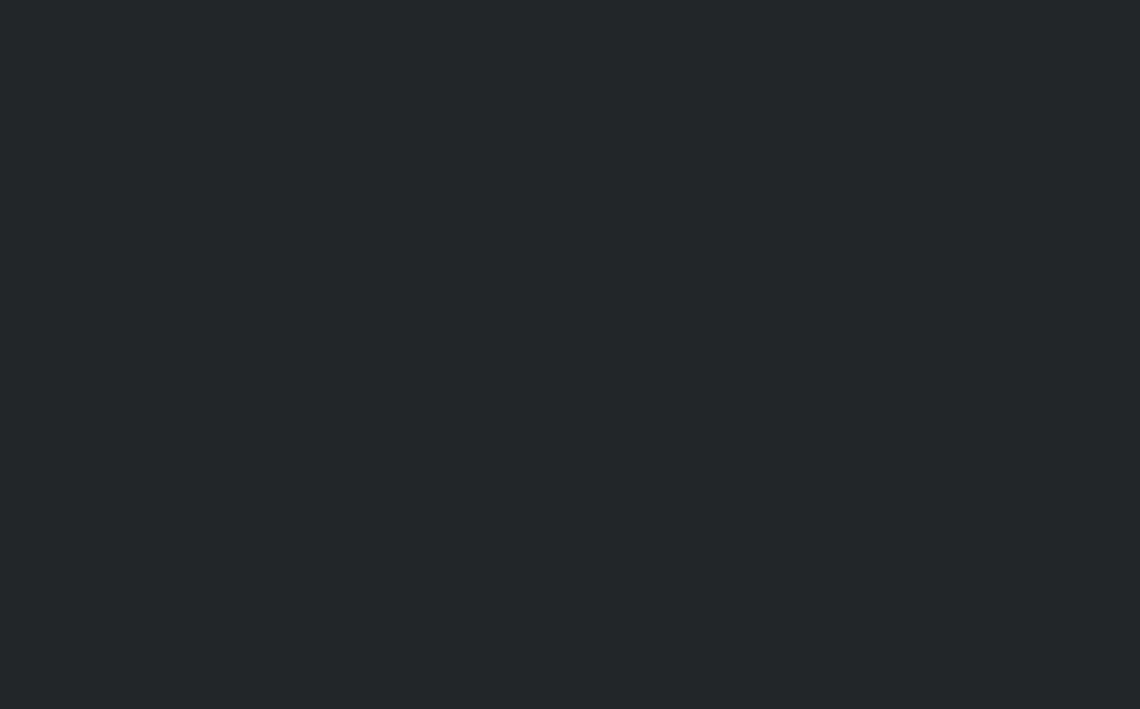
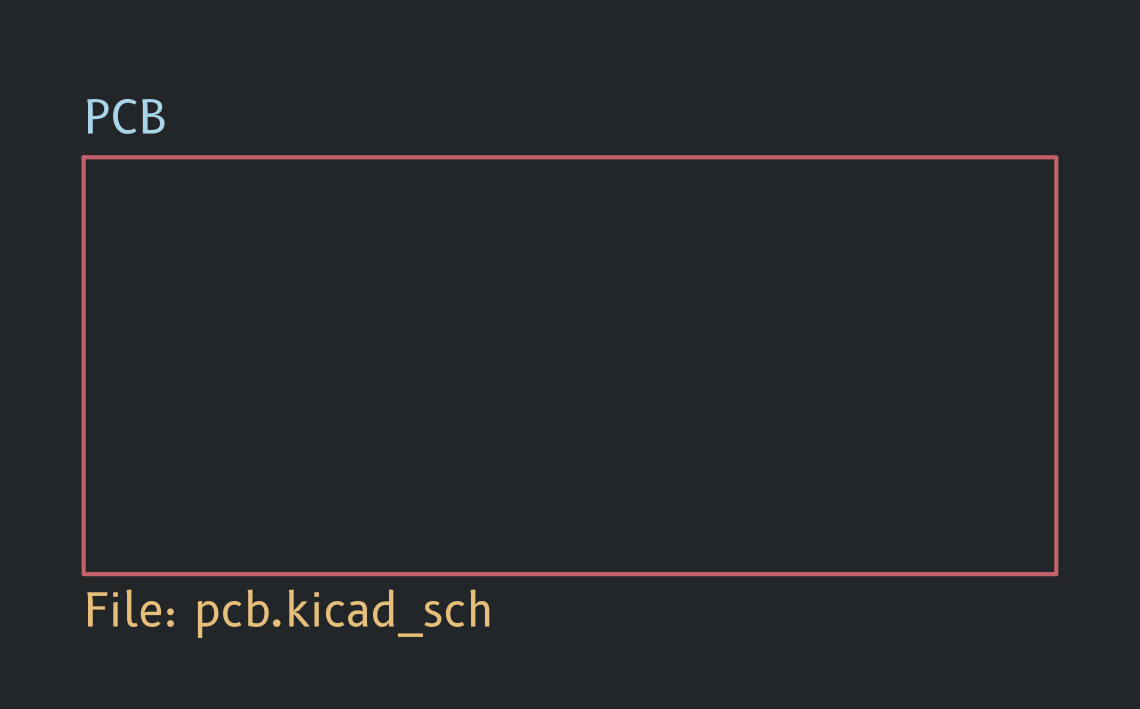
sheet PCB: none -> File: pcb.kicad_sch (569, 365)

